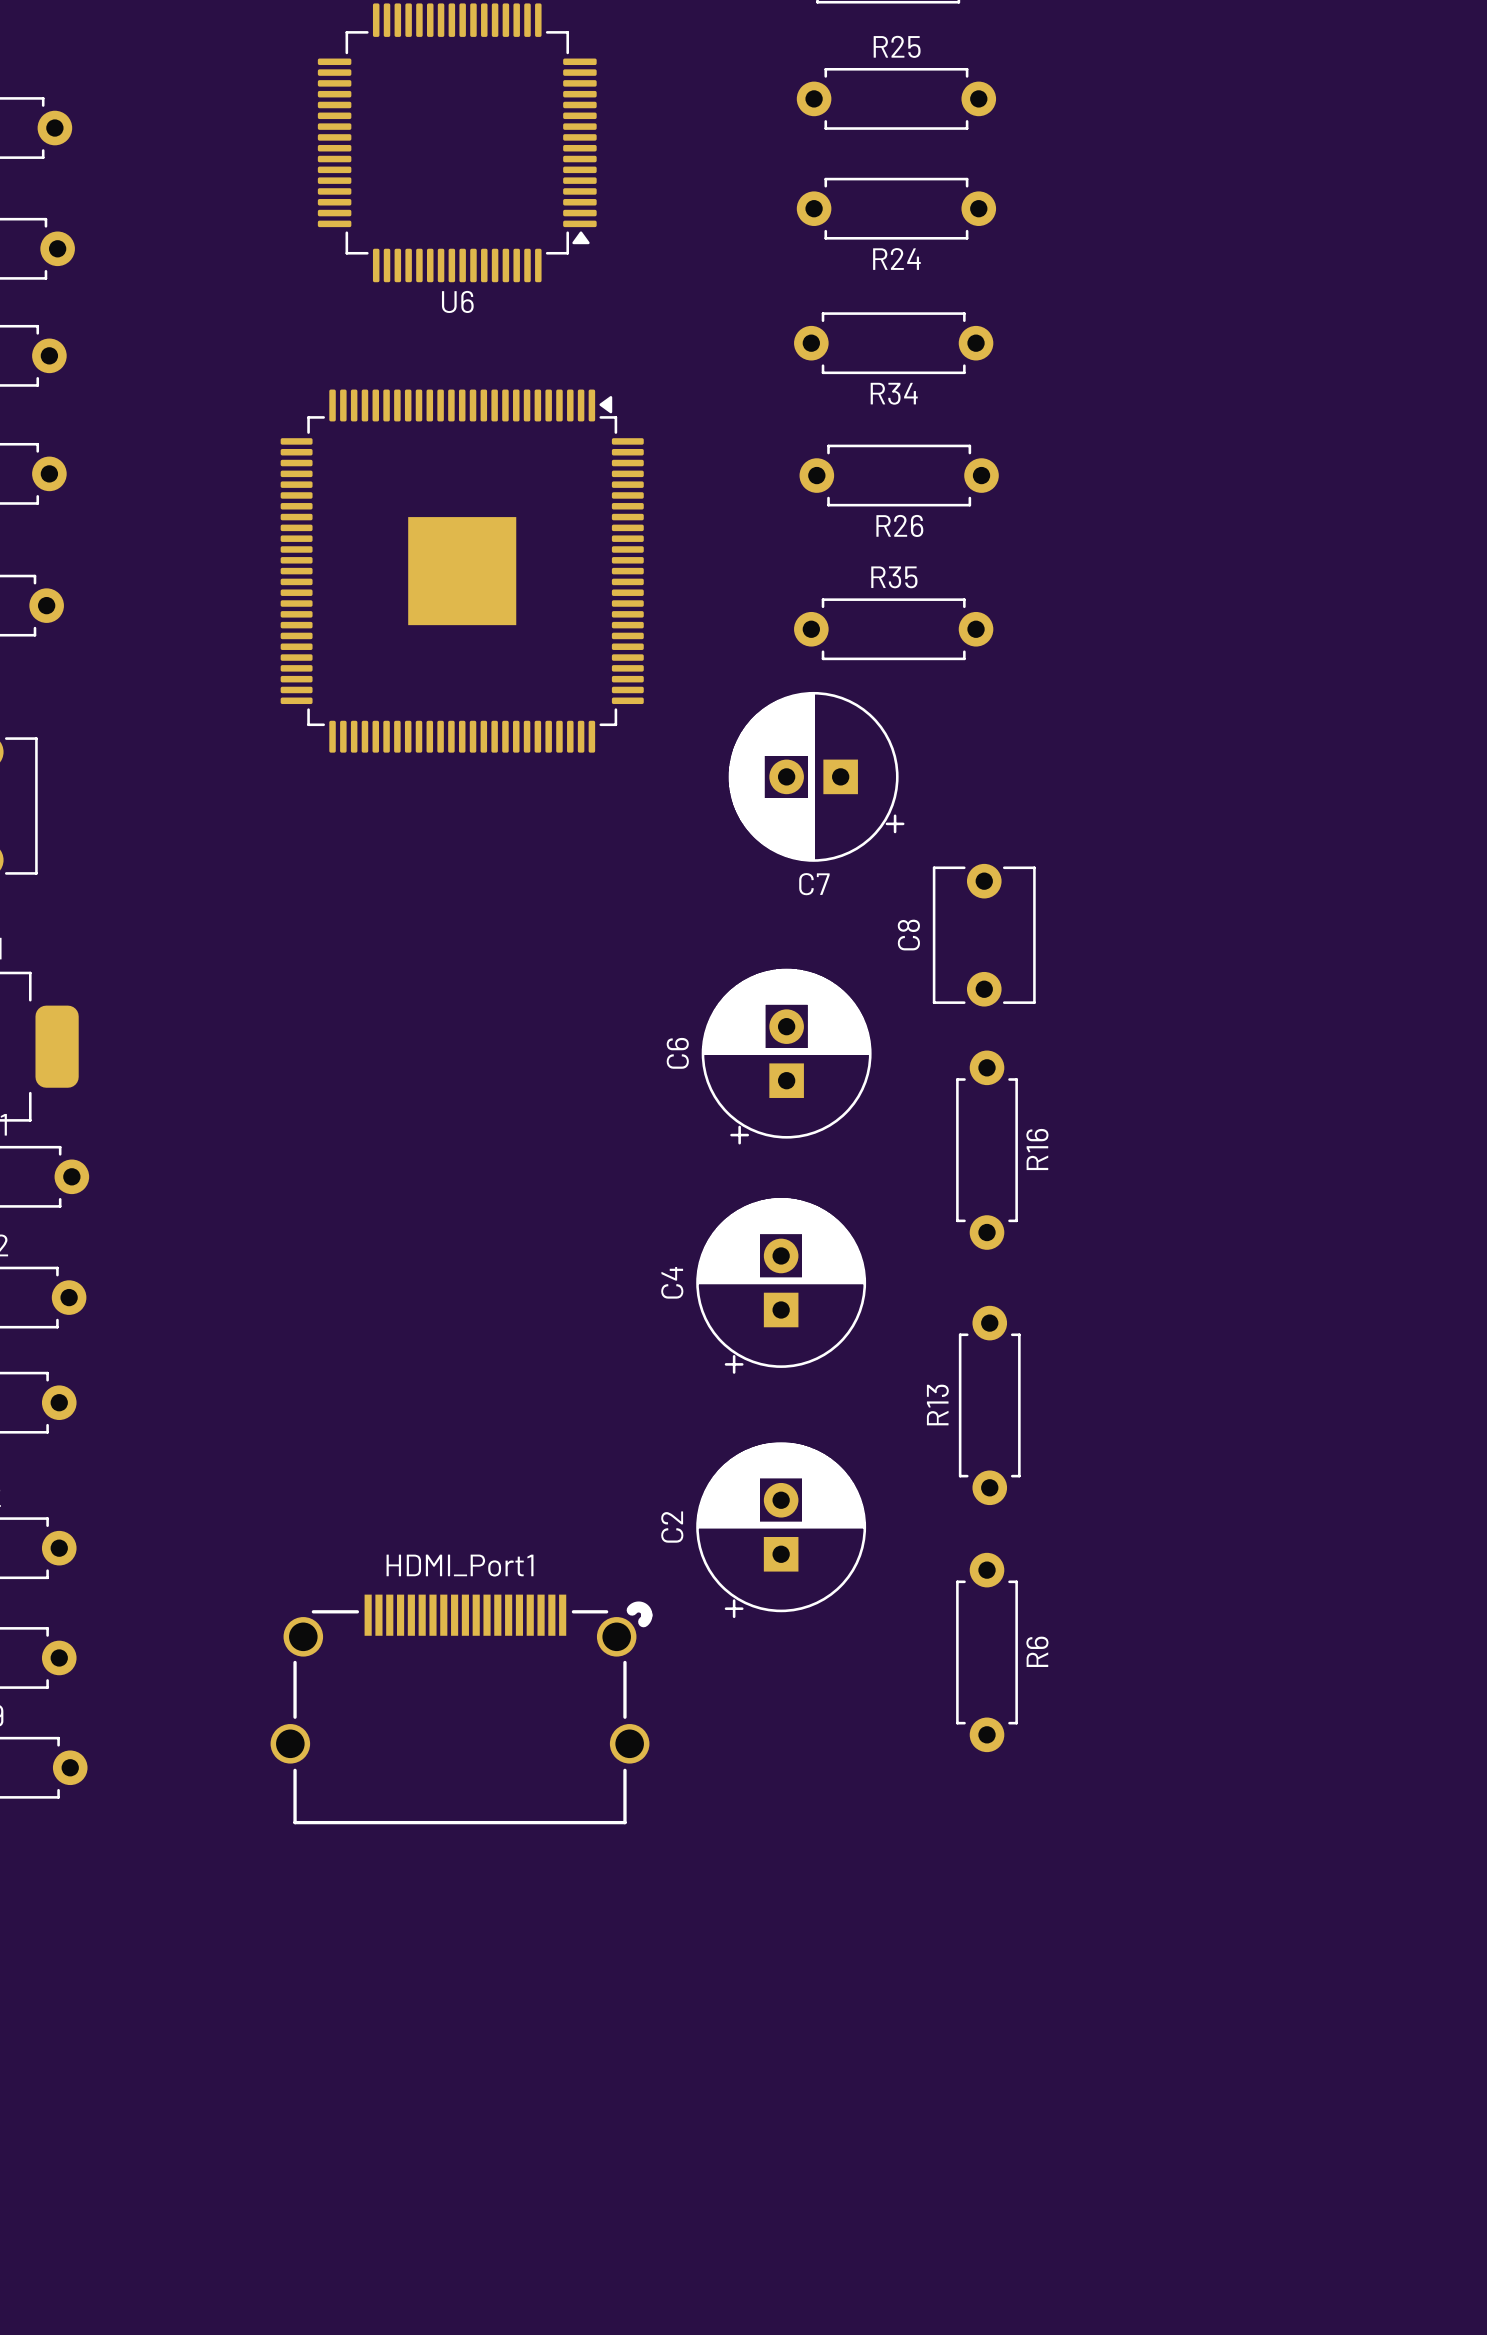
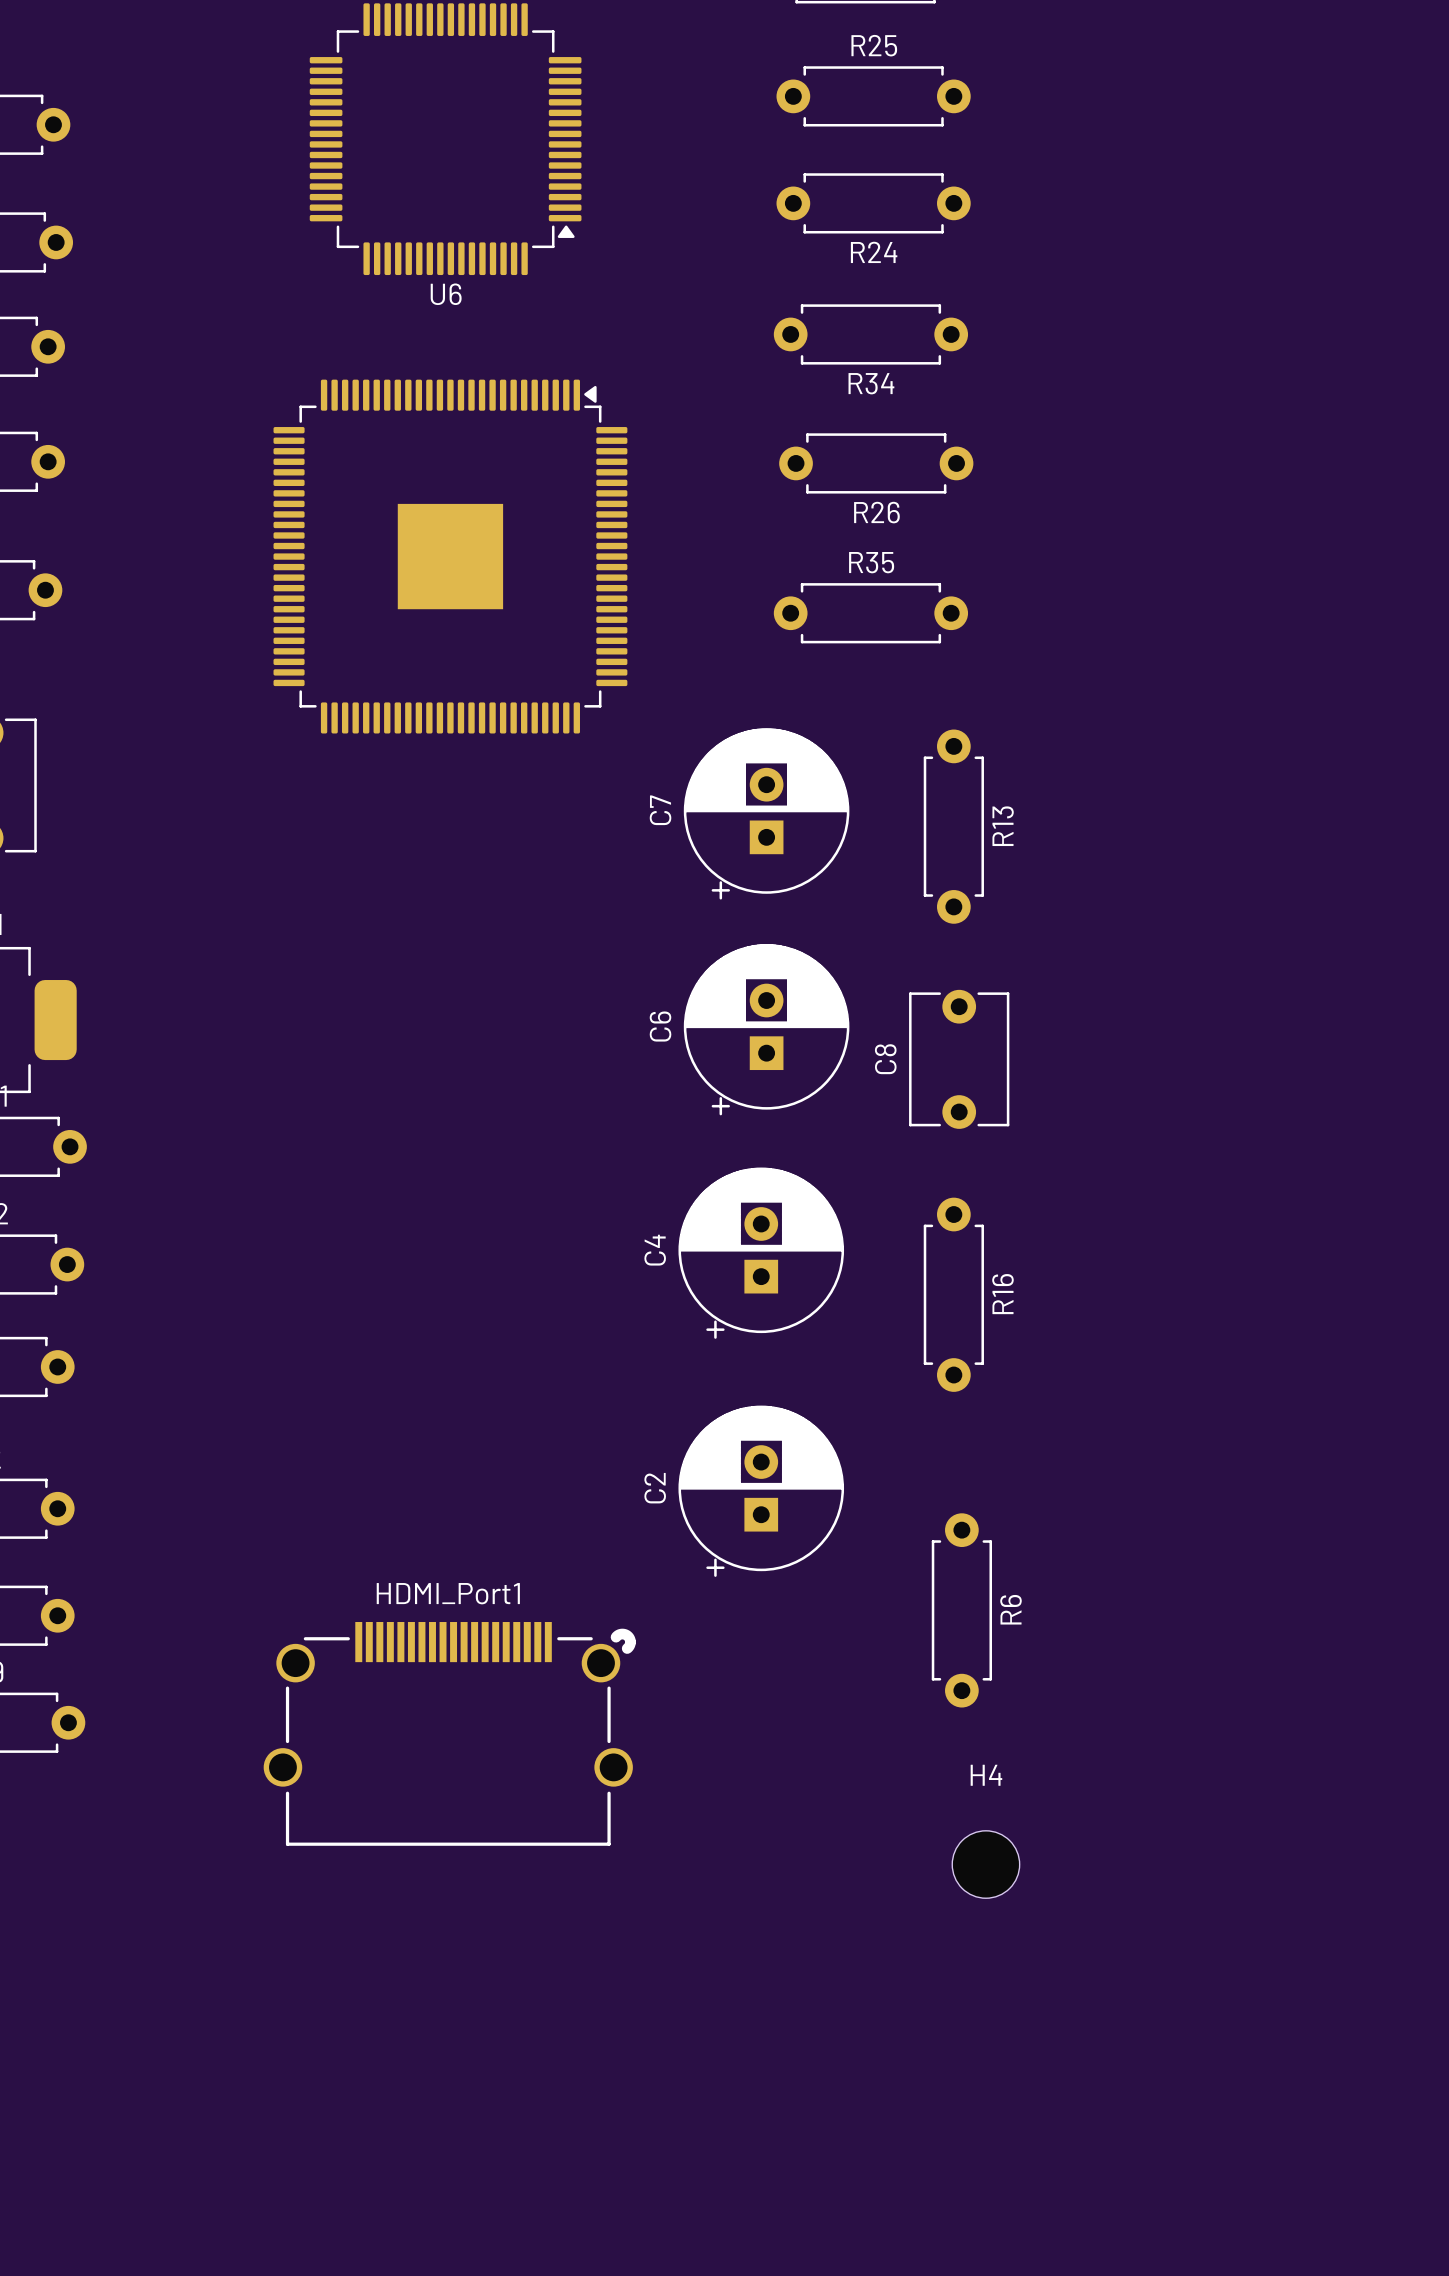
C7 rotation: 0° (816, 776) -> 90° clockwise (766, 813)
C8 position: (984, 935) -> (959, 1059)
R16 position: (987, 1150) -> (953, 1294)
R13 name position: R13 (937, 1405) -> R13 (1003, 826)
R13 position: (989, 1405) -> (953, 826)
HDMI_Port1 position: (461, 1709) -> (449, 1733)
H4: none -> (985, 1864)

